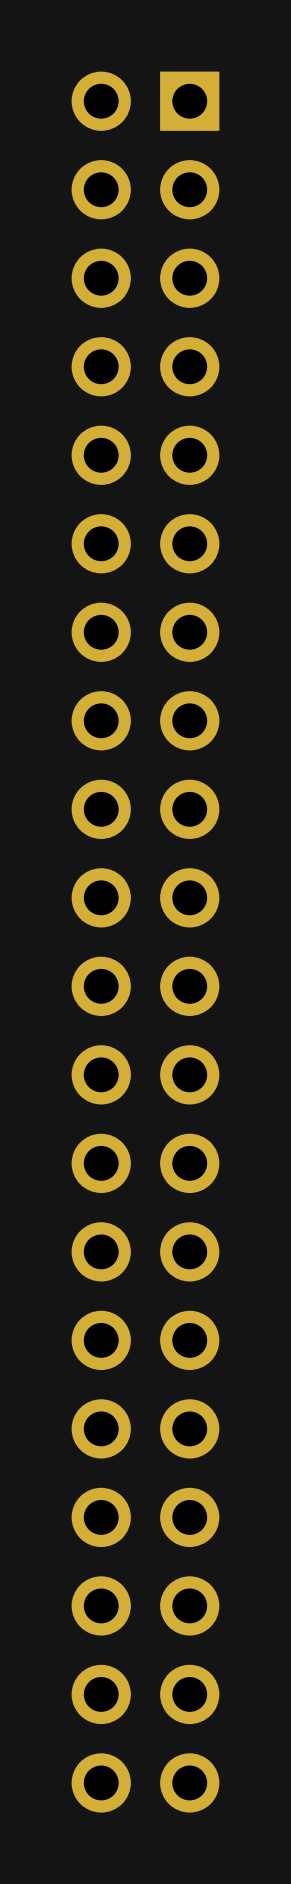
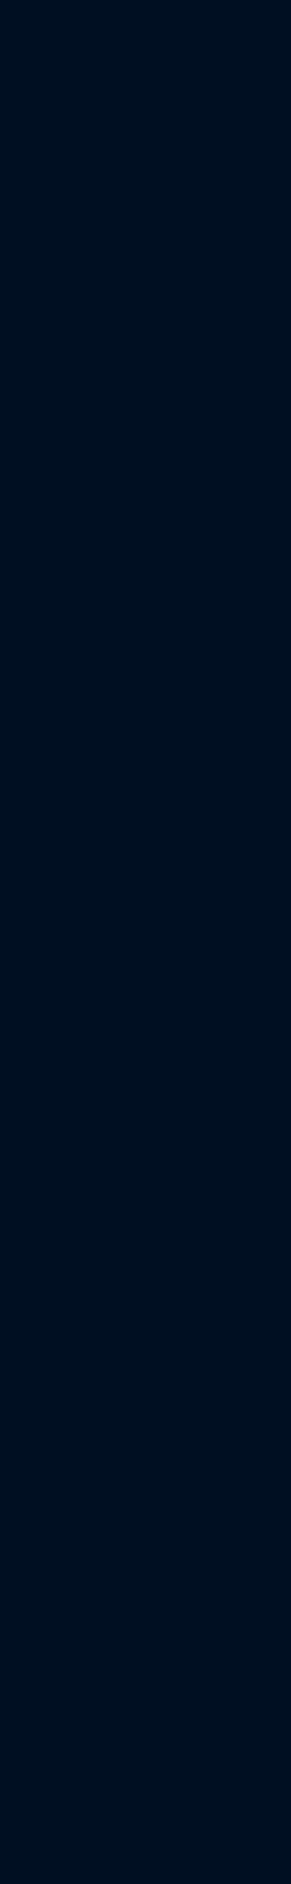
part: (145, 942) -> none

